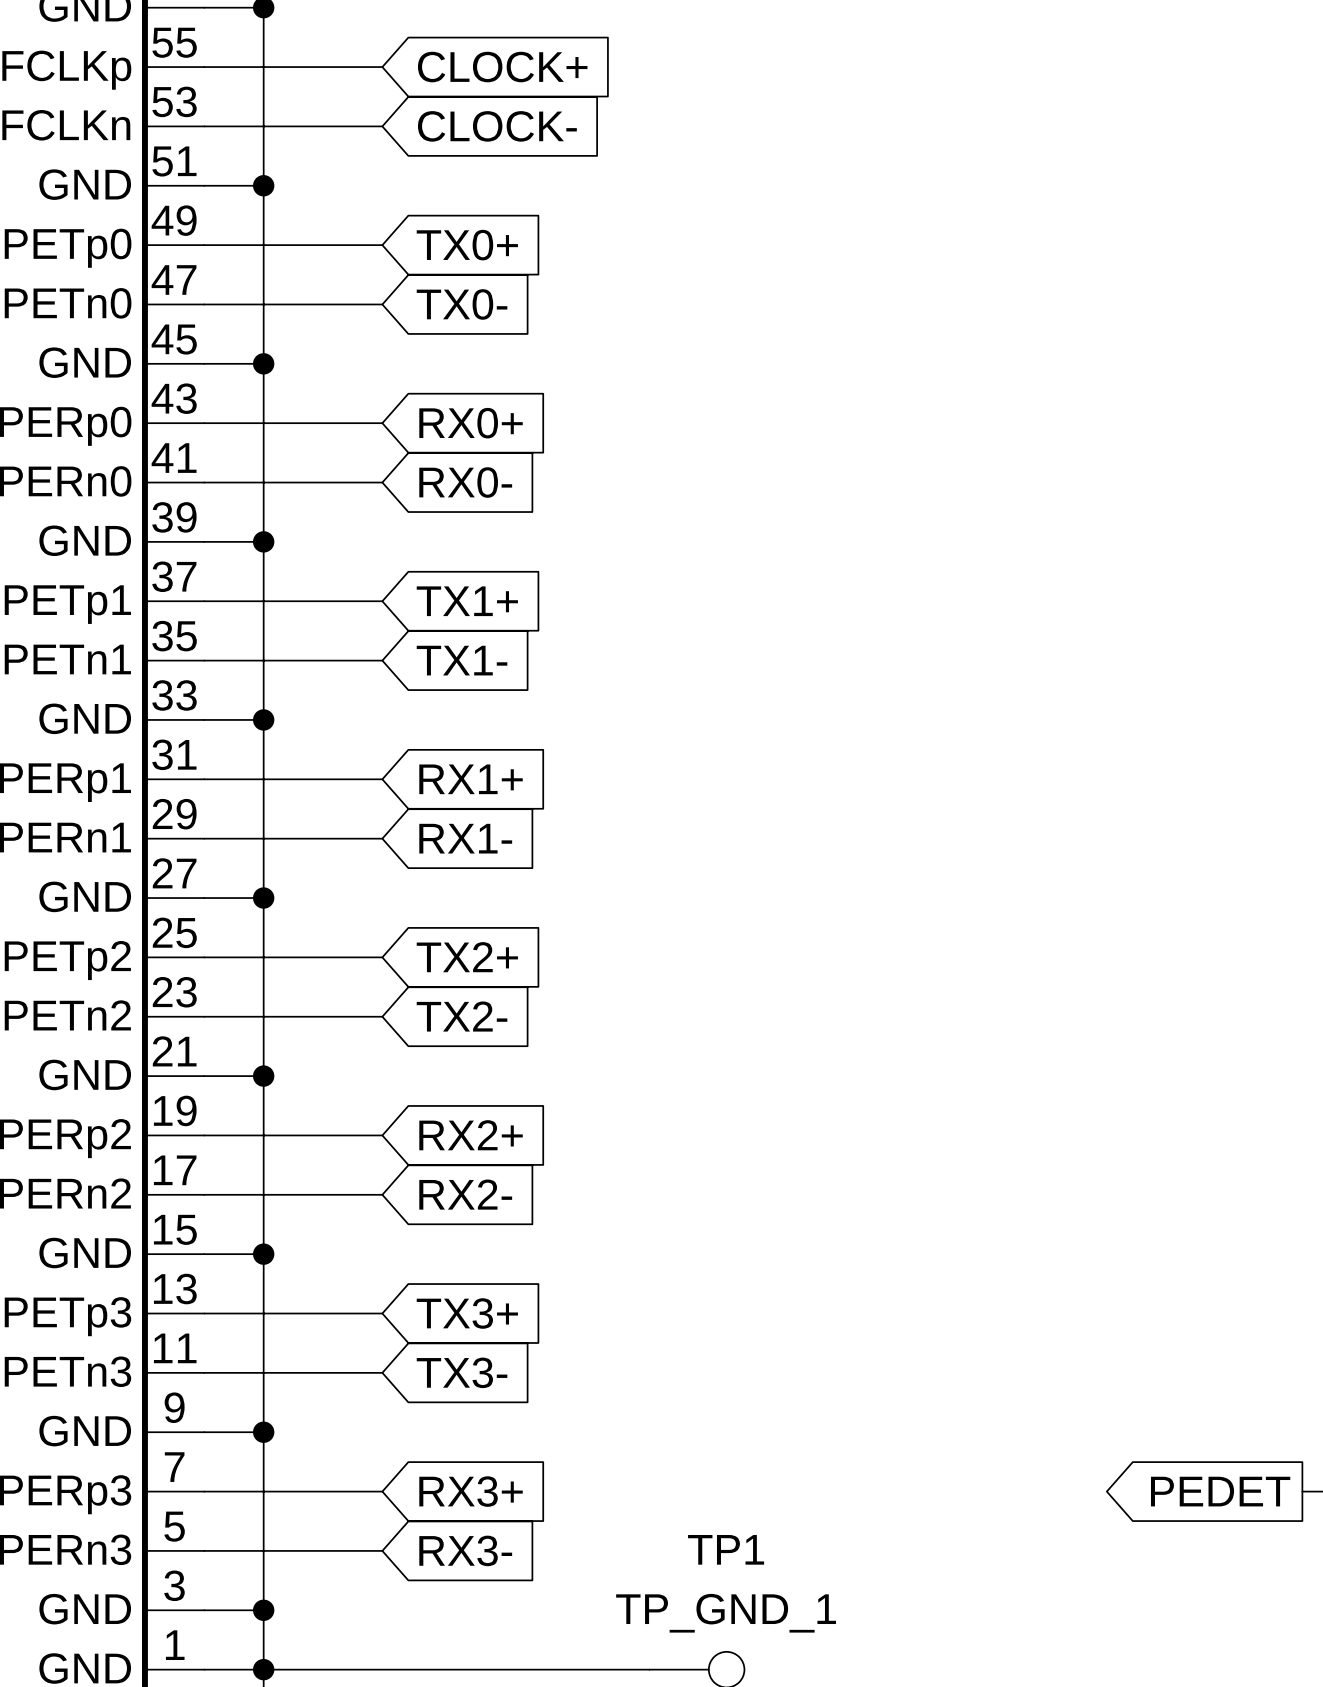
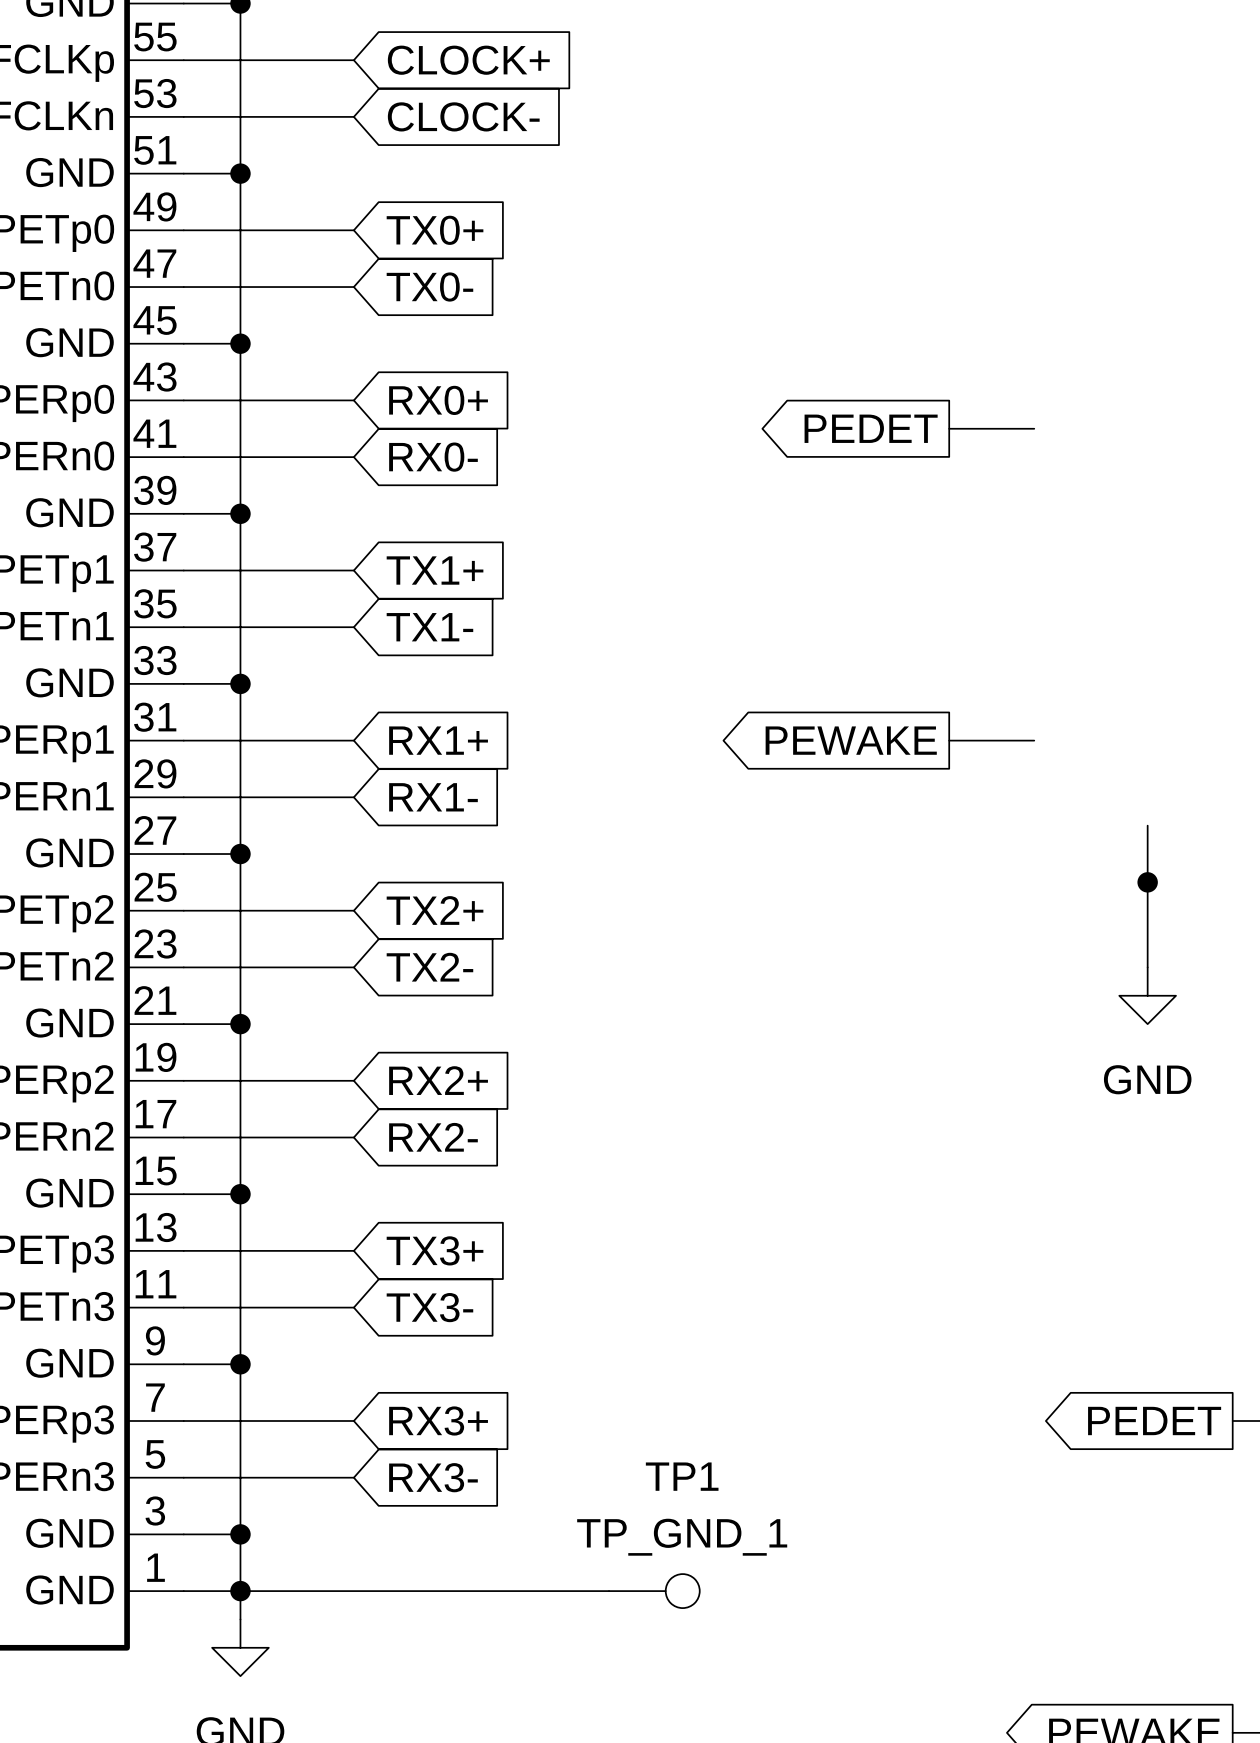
global label: none -> PEDET (871, 428)
wire: none -> (949, 428) (1034, 428)
global label: none -> PEWAKE (851, 740)
wire: none -> (949, 740) (1034, 740)
wire: none -> (1147, 825) (1147, 967)
junction: none -> (1147, 882)
power symbol: none -> GND (1147, 995)

